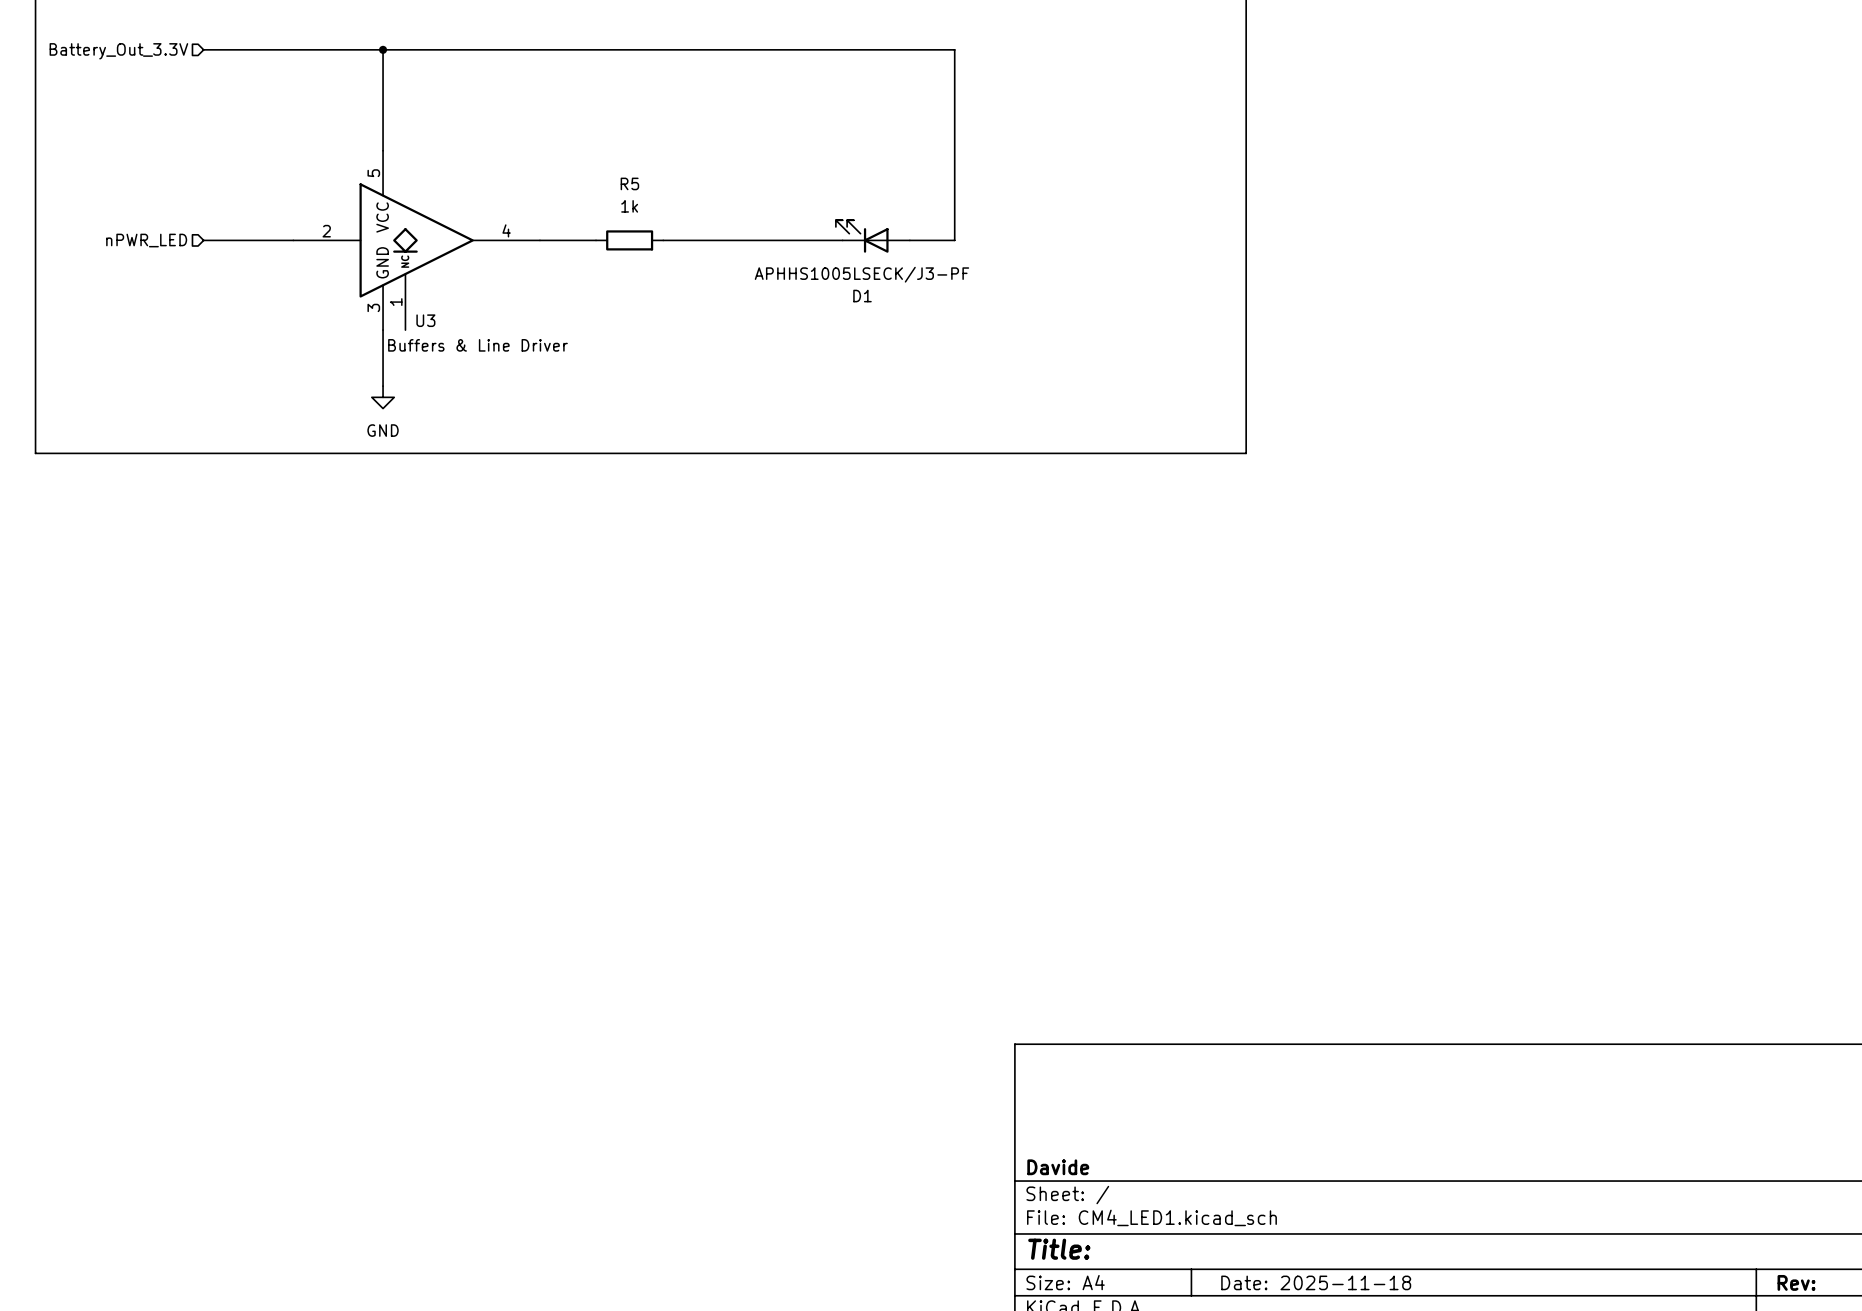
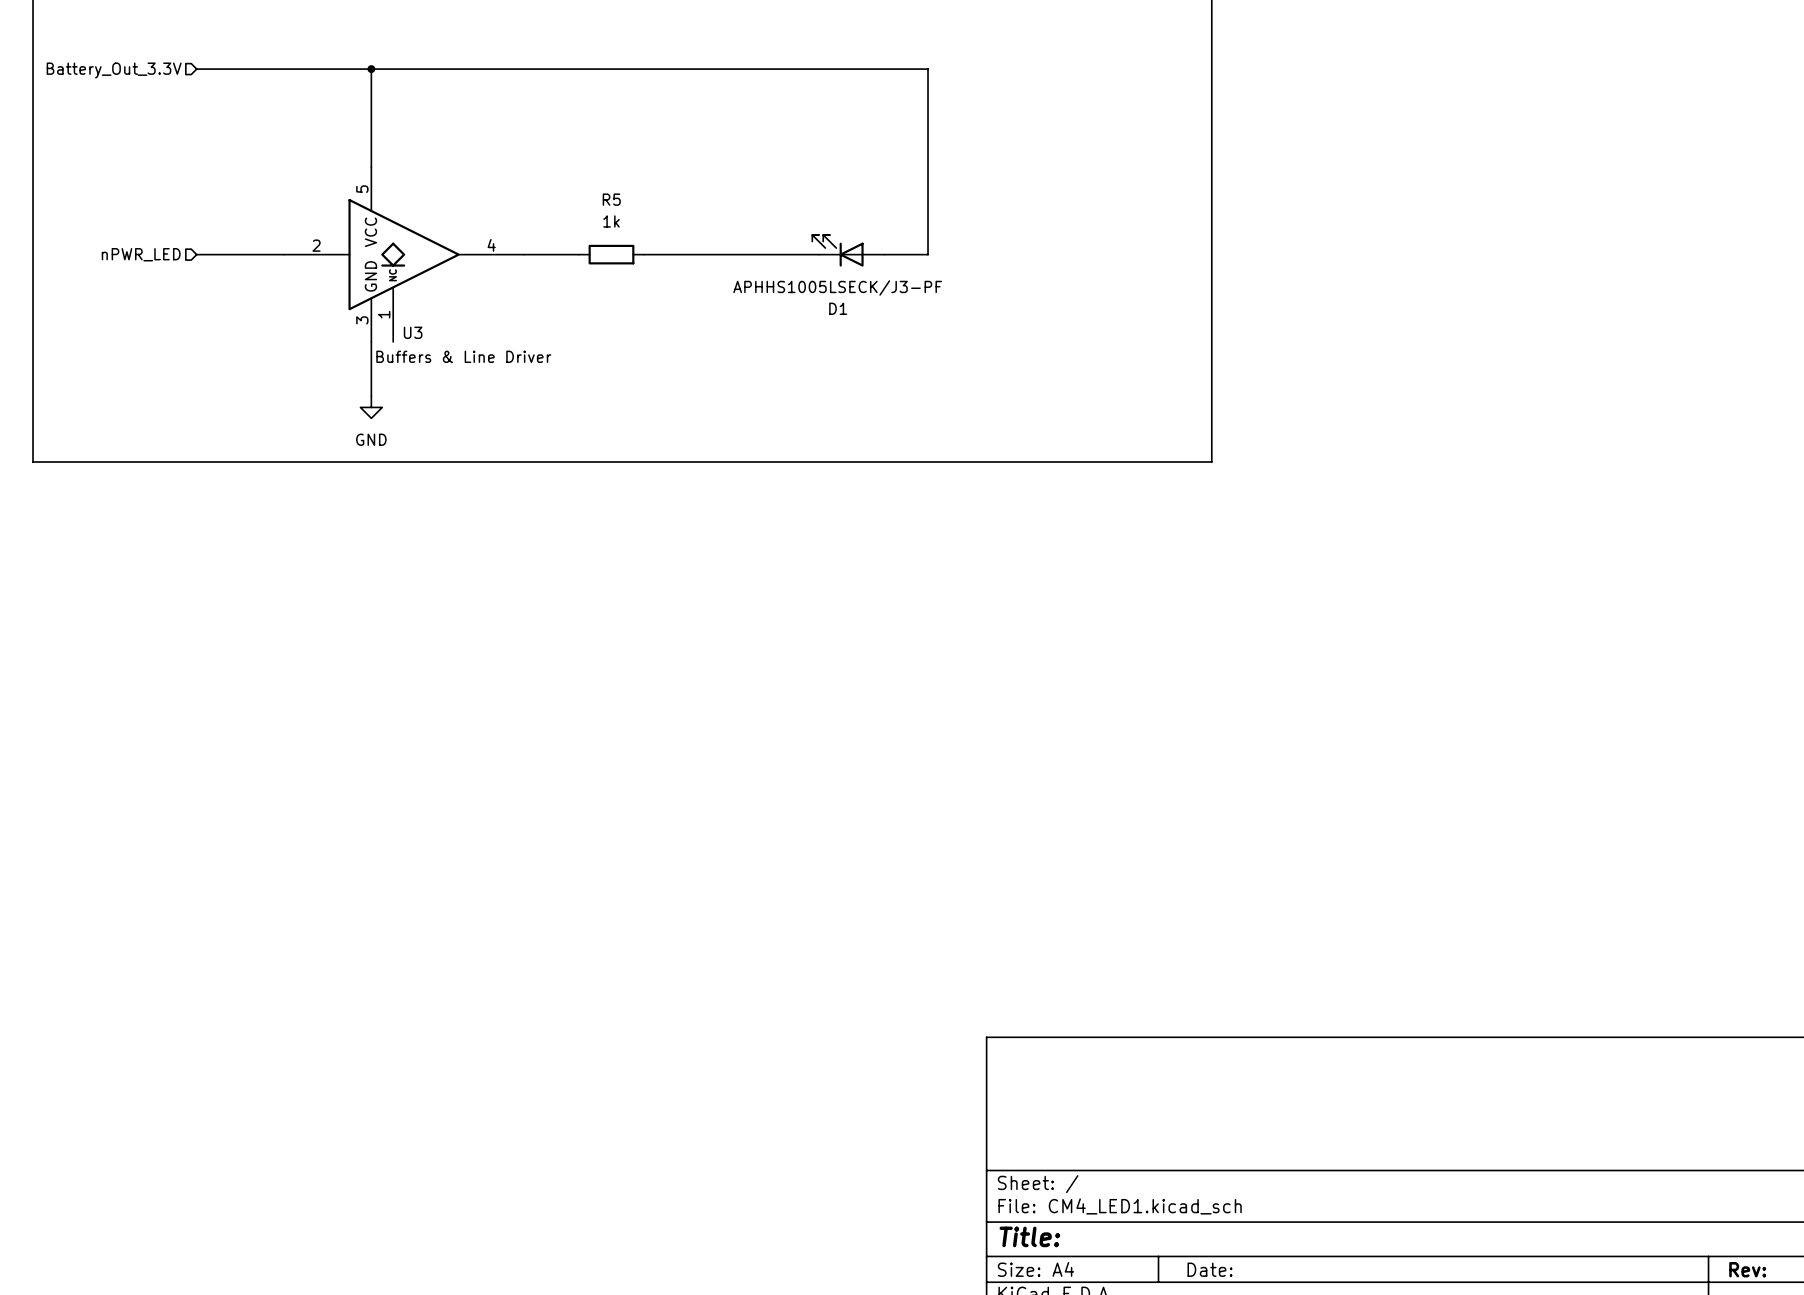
title block: Davide (1058, 1167) -> none
title block: Date: 2025-11-18 (1316, 1282) -> Date: (1210, 1269)

